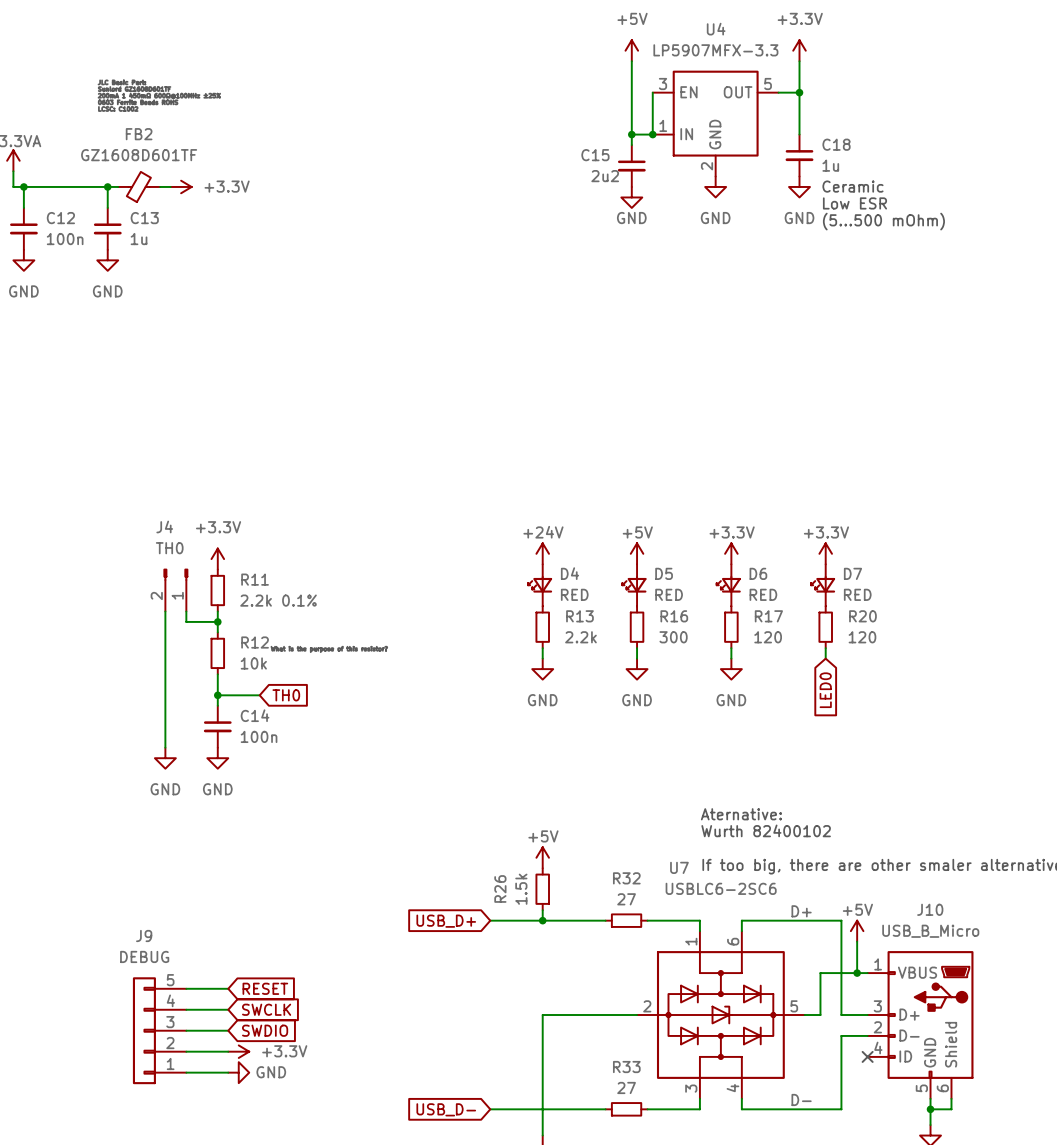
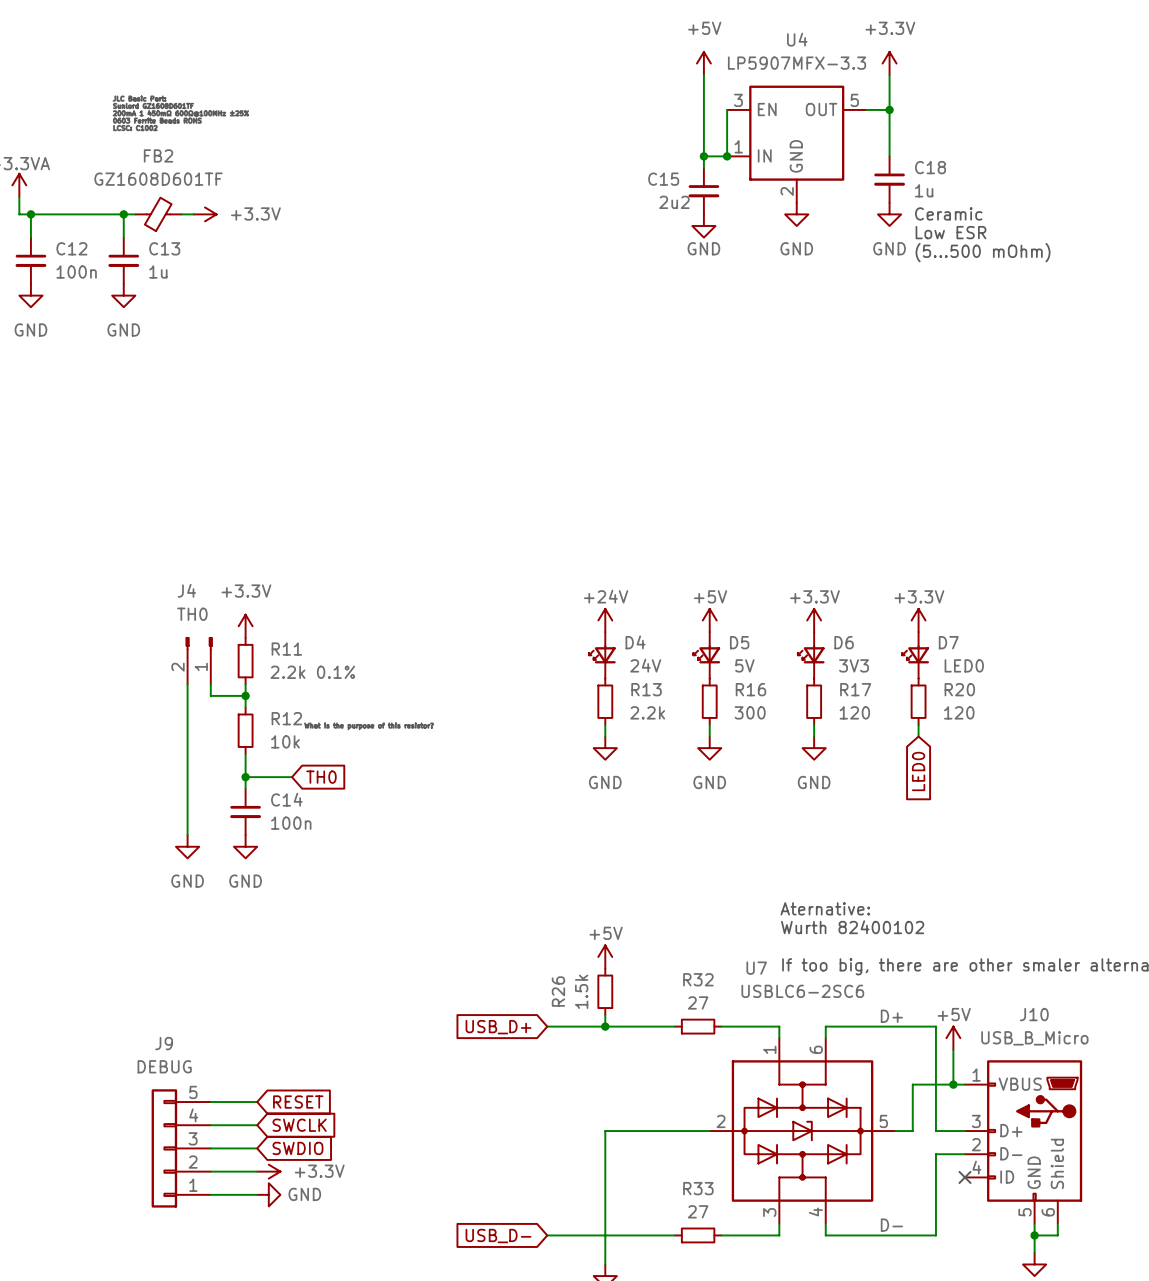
D4 value: RED (574, 594) -> 24V (645, 665)
D5 value: RED (669, 594) -> 5V (744, 665)
D6 value: RED (763, 594) -> 3V3 (854, 665)
D7 value: RED (857, 594) -> LED0 (964, 665)

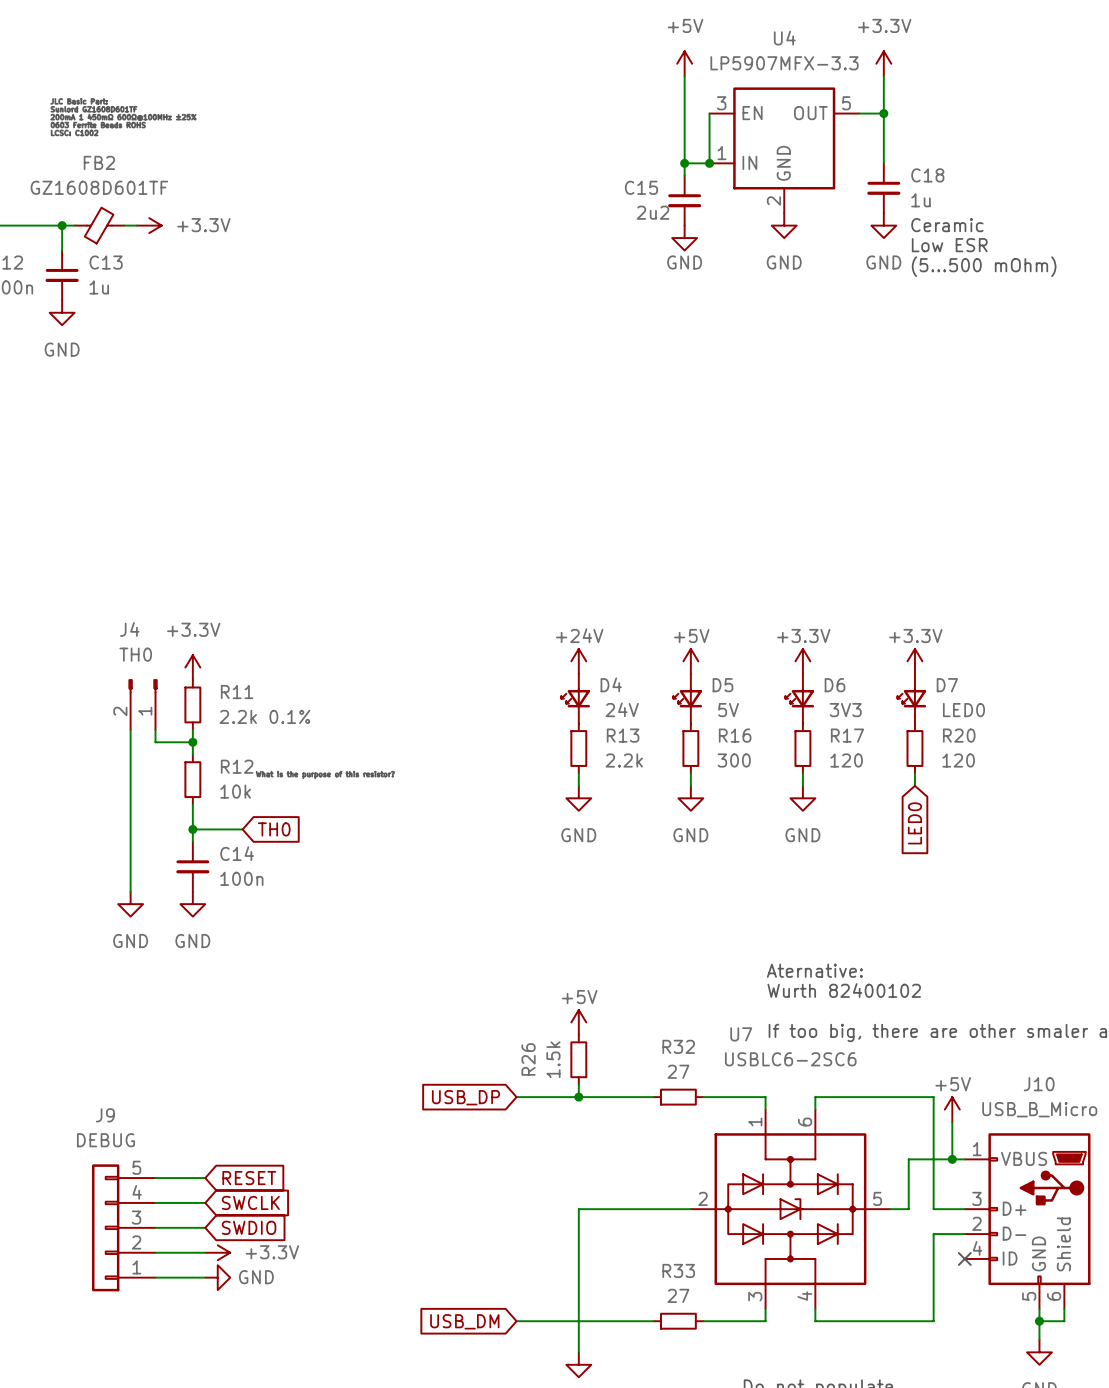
label: D+ (891, 1016) -> none
global label: USB_D+ (498, 1027) -> USB_DP (466, 1097)
label: D- (891, 1225) -> none
global label: USB_D- (498, 1236) -> USB_DM (464, 1321)

